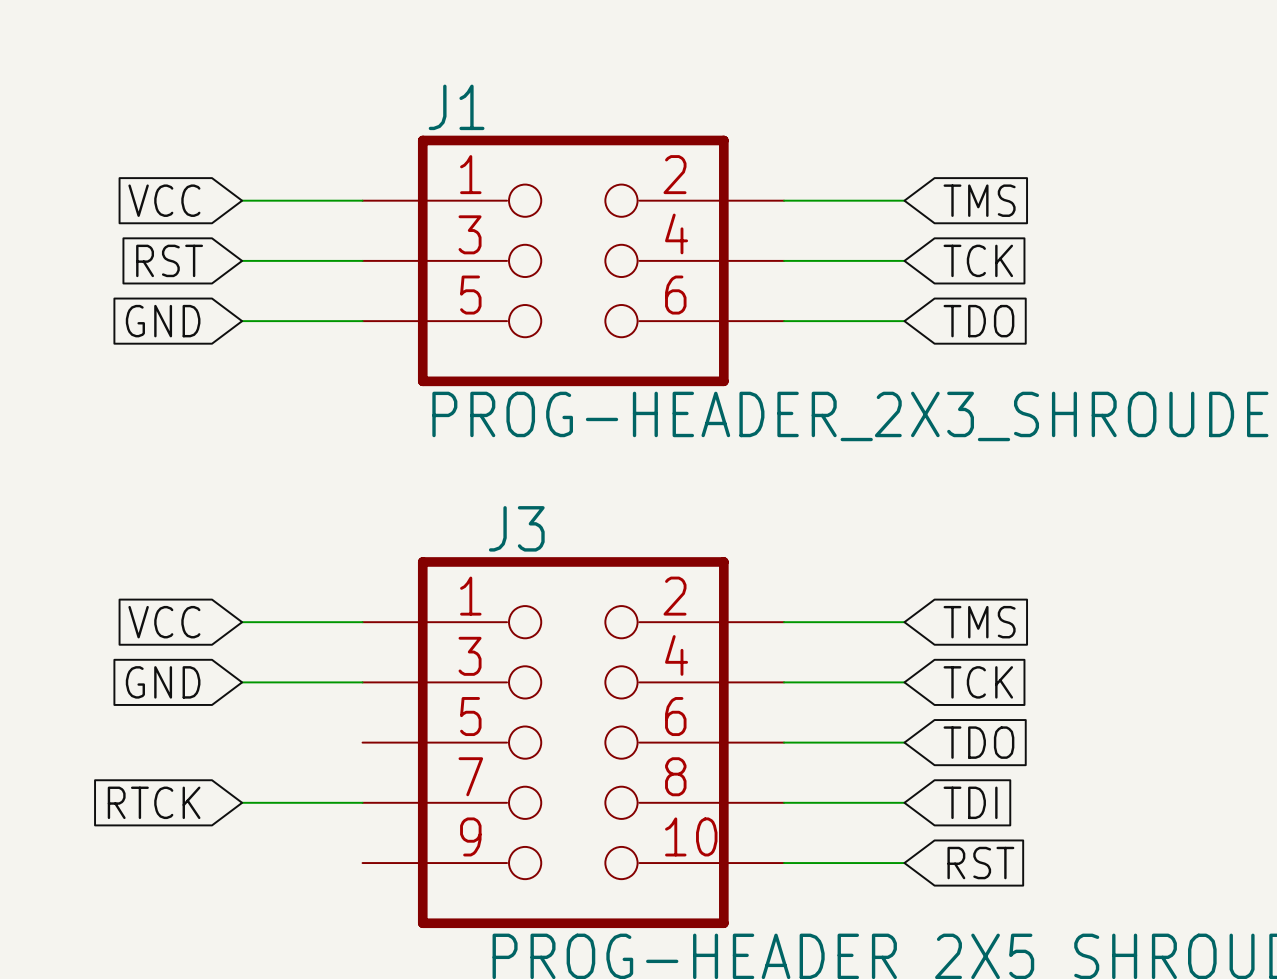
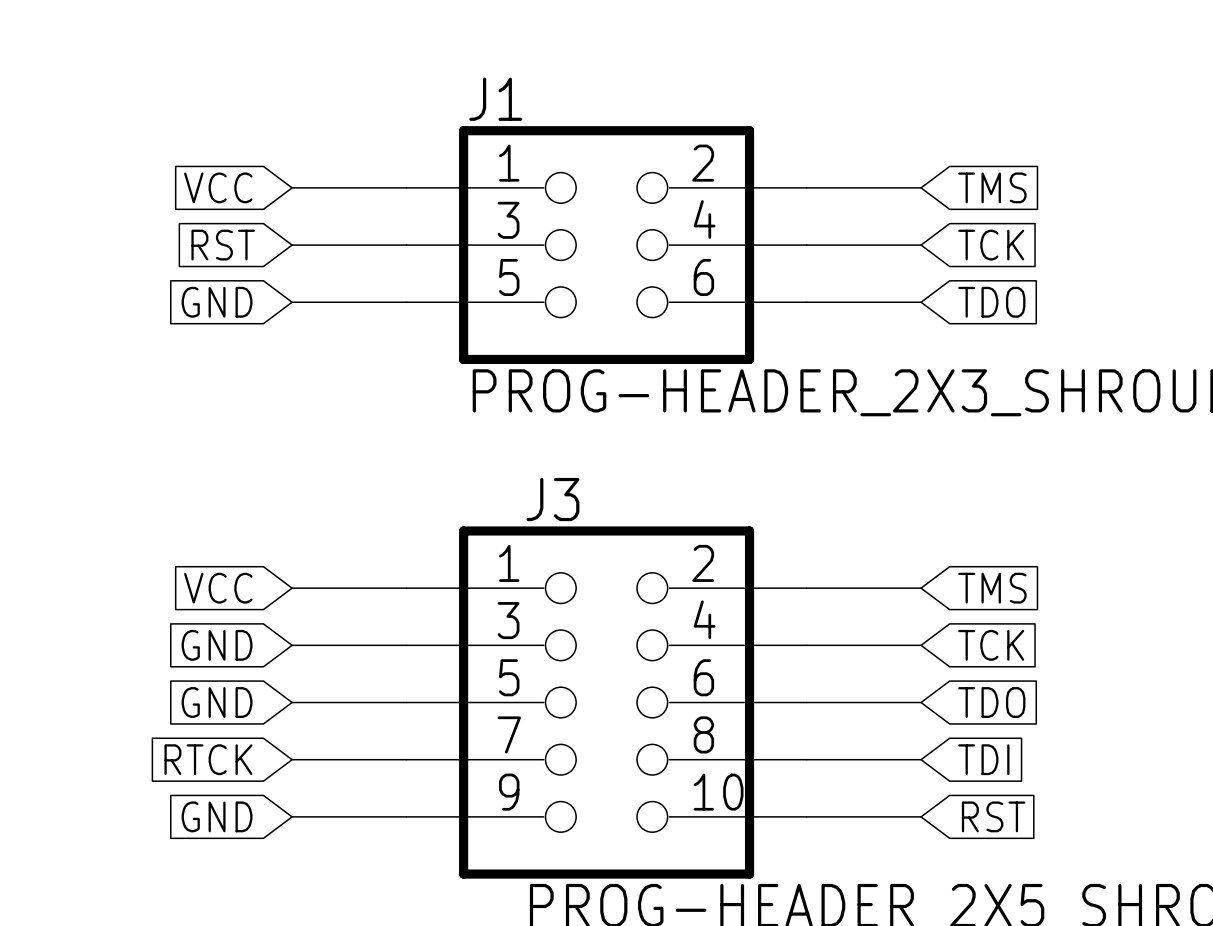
global label: none -> GND (217, 702)
wire: none -> (292, 702) (406, 702)
global label: none -> GND (217, 816)
wire: none -> (292, 816) (406, 816)

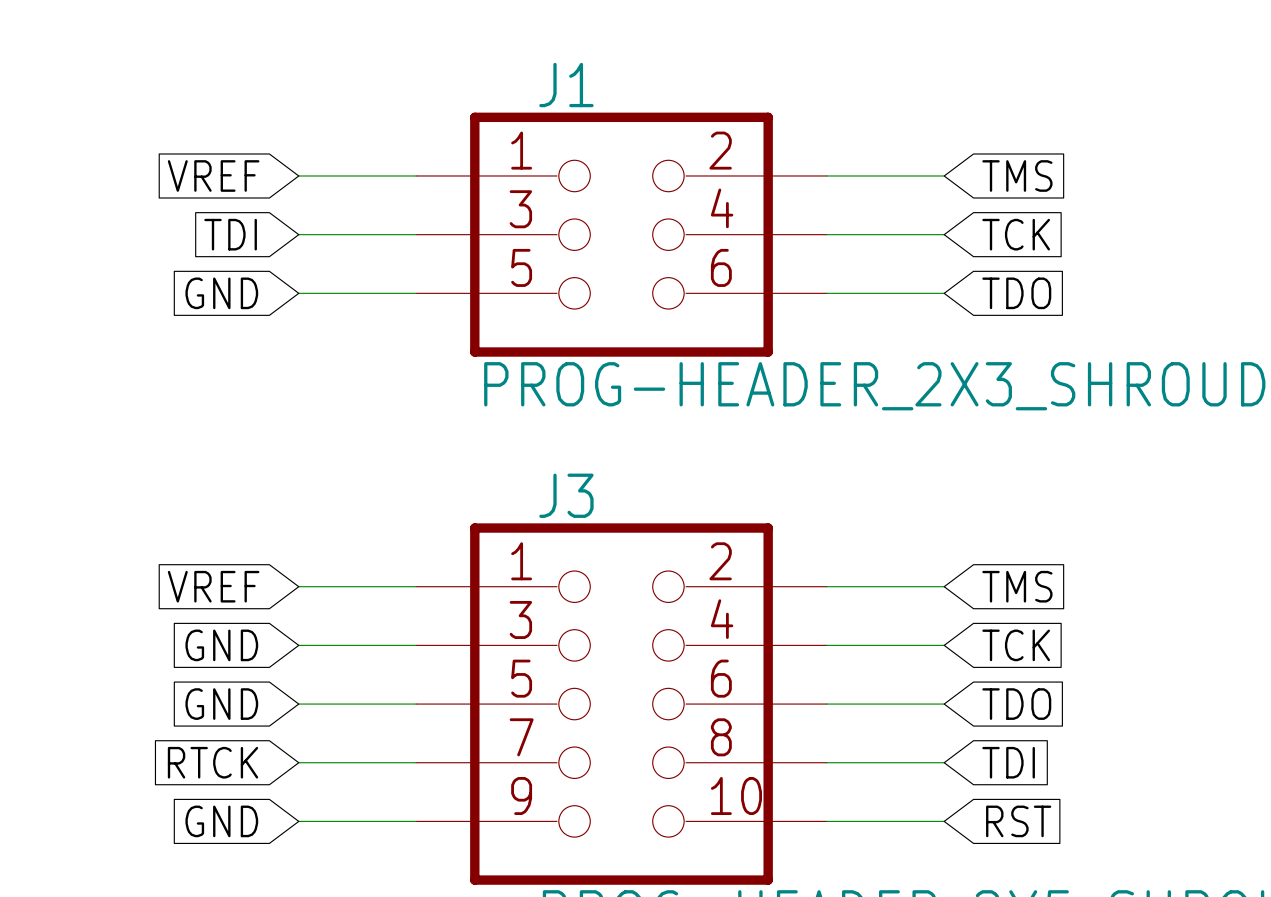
J1 name position: J1 (495, 99) -> J1 (566, 85)
global label: VCC (218, 187) -> VREF (213, 175)
global label: RST (223, 245) -> TDI (230, 234)
global label: VCC (218, 588) -> VREF (213, 586)

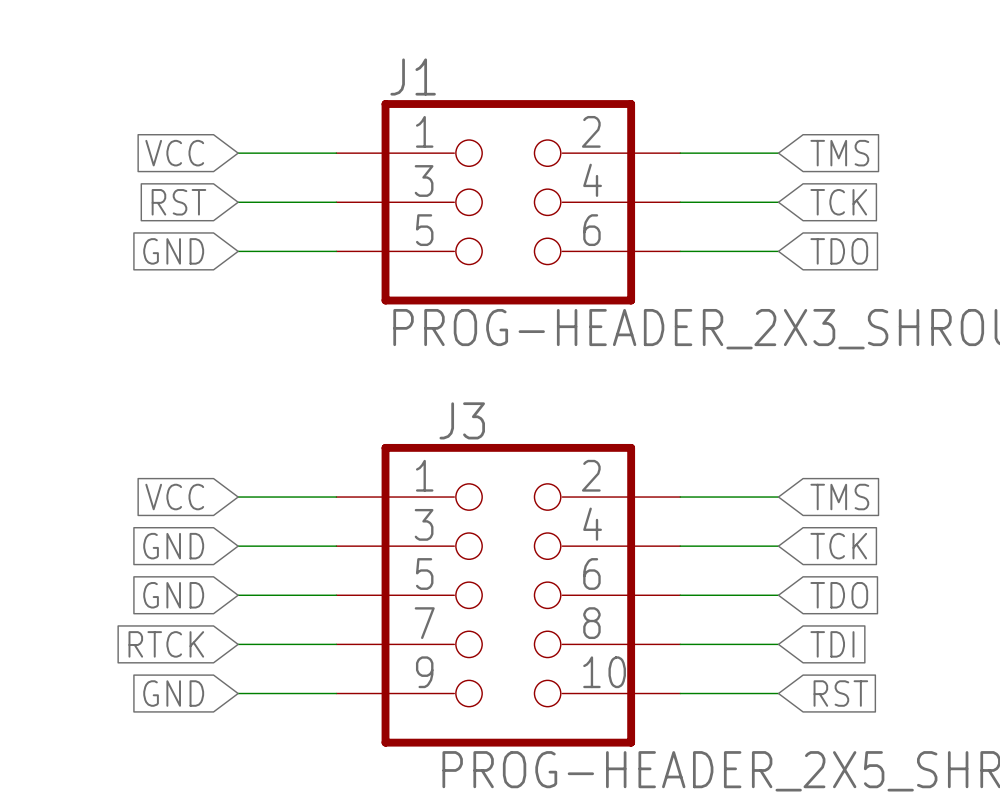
J1 name position: J1 (566, 85) -> J1 (413, 77)
global label: VREF (213, 175) -> VCC (174, 153)
global label: TDI (230, 234) -> RST (178, 202)
global label: VREF (213, 586) -> VCC (174, 497)

